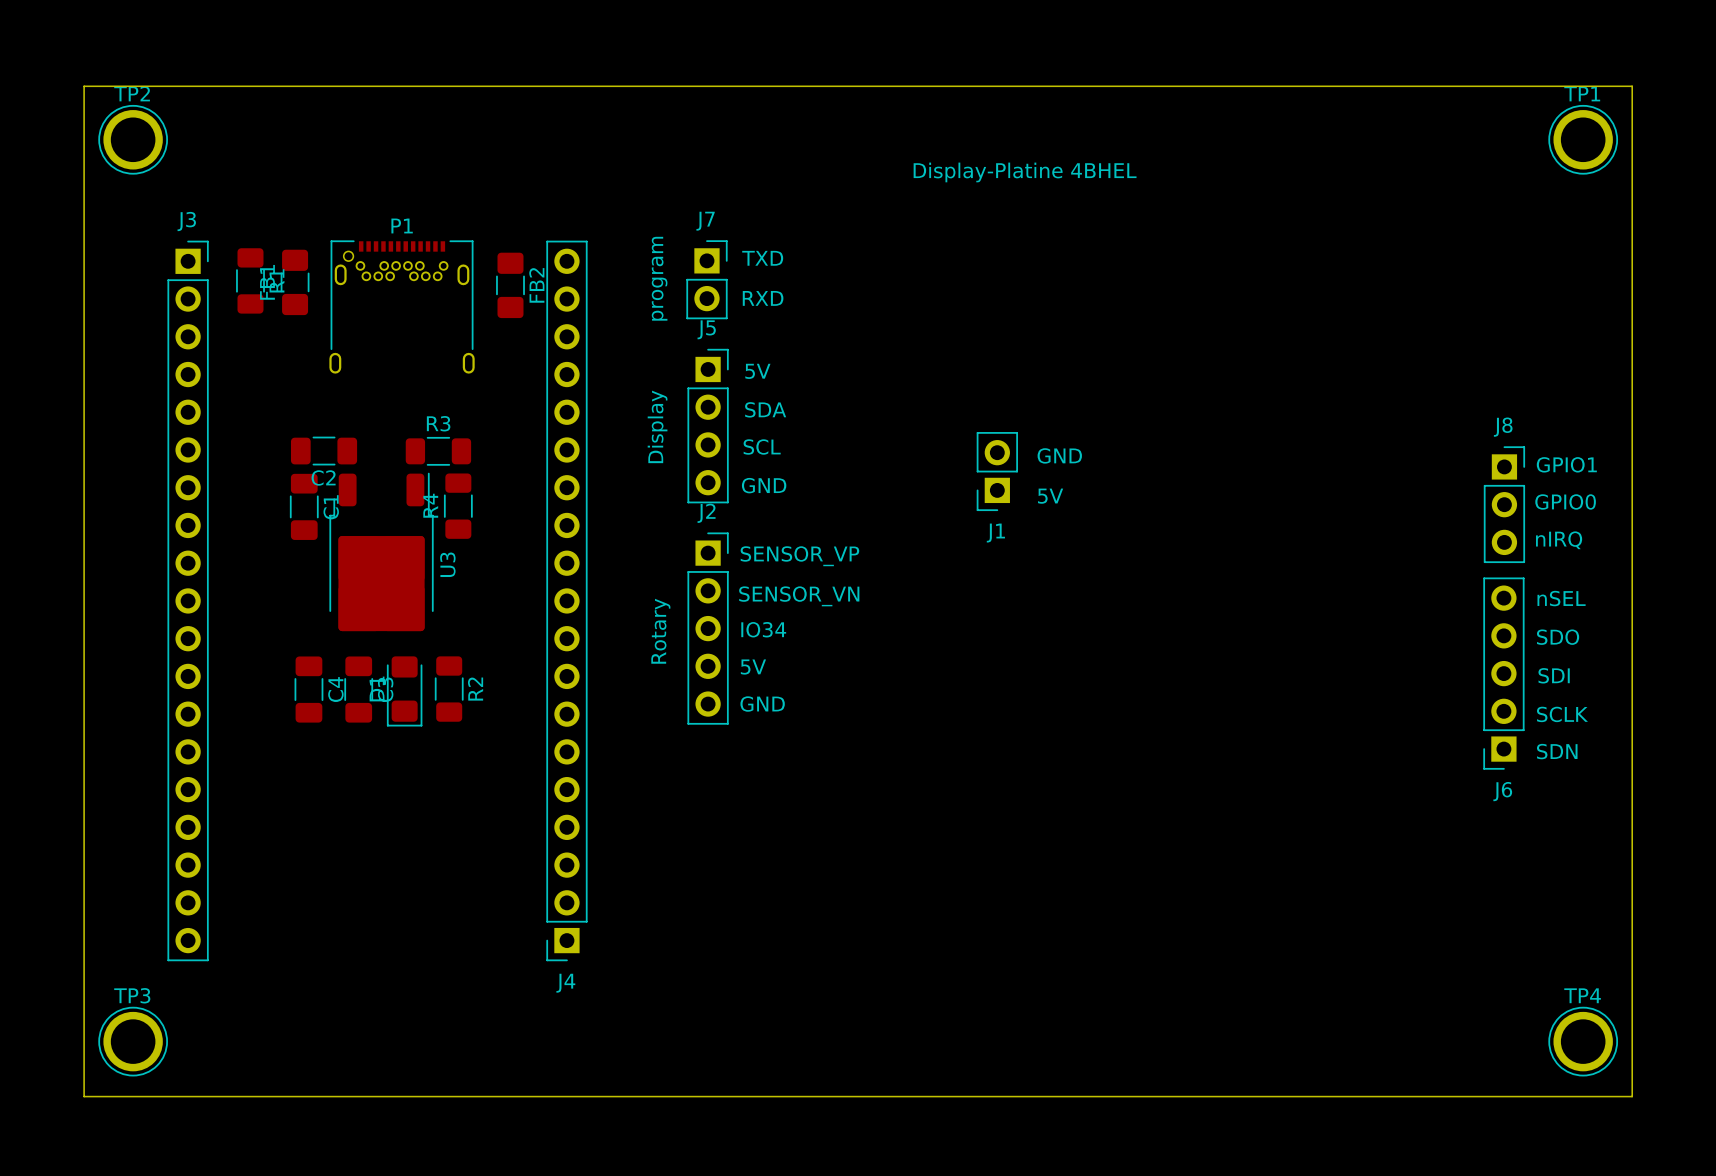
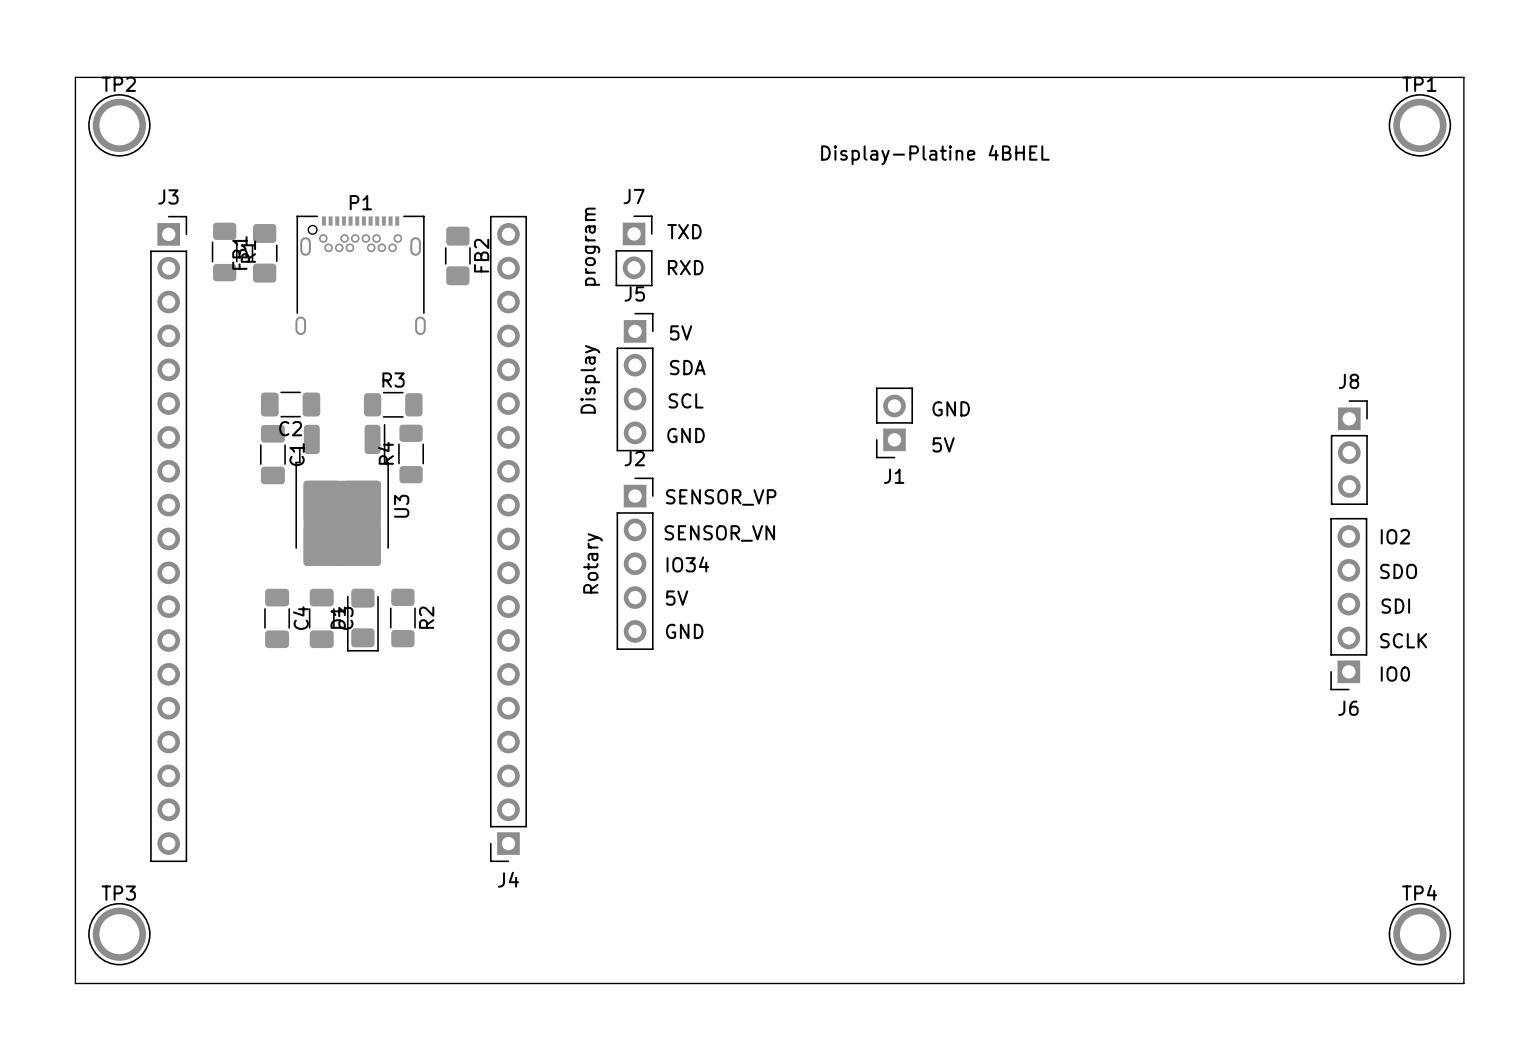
text: GPIO1 (1566, 464) -> none
text: GPIO0 (1565, 501) -> none
text: nIRQ (1559, 540) -> none
text: nSEL (1561, 598) -> IO2 (1395, 536)
text: SDN (1557, 751) -> IO0 (1395, 674)

